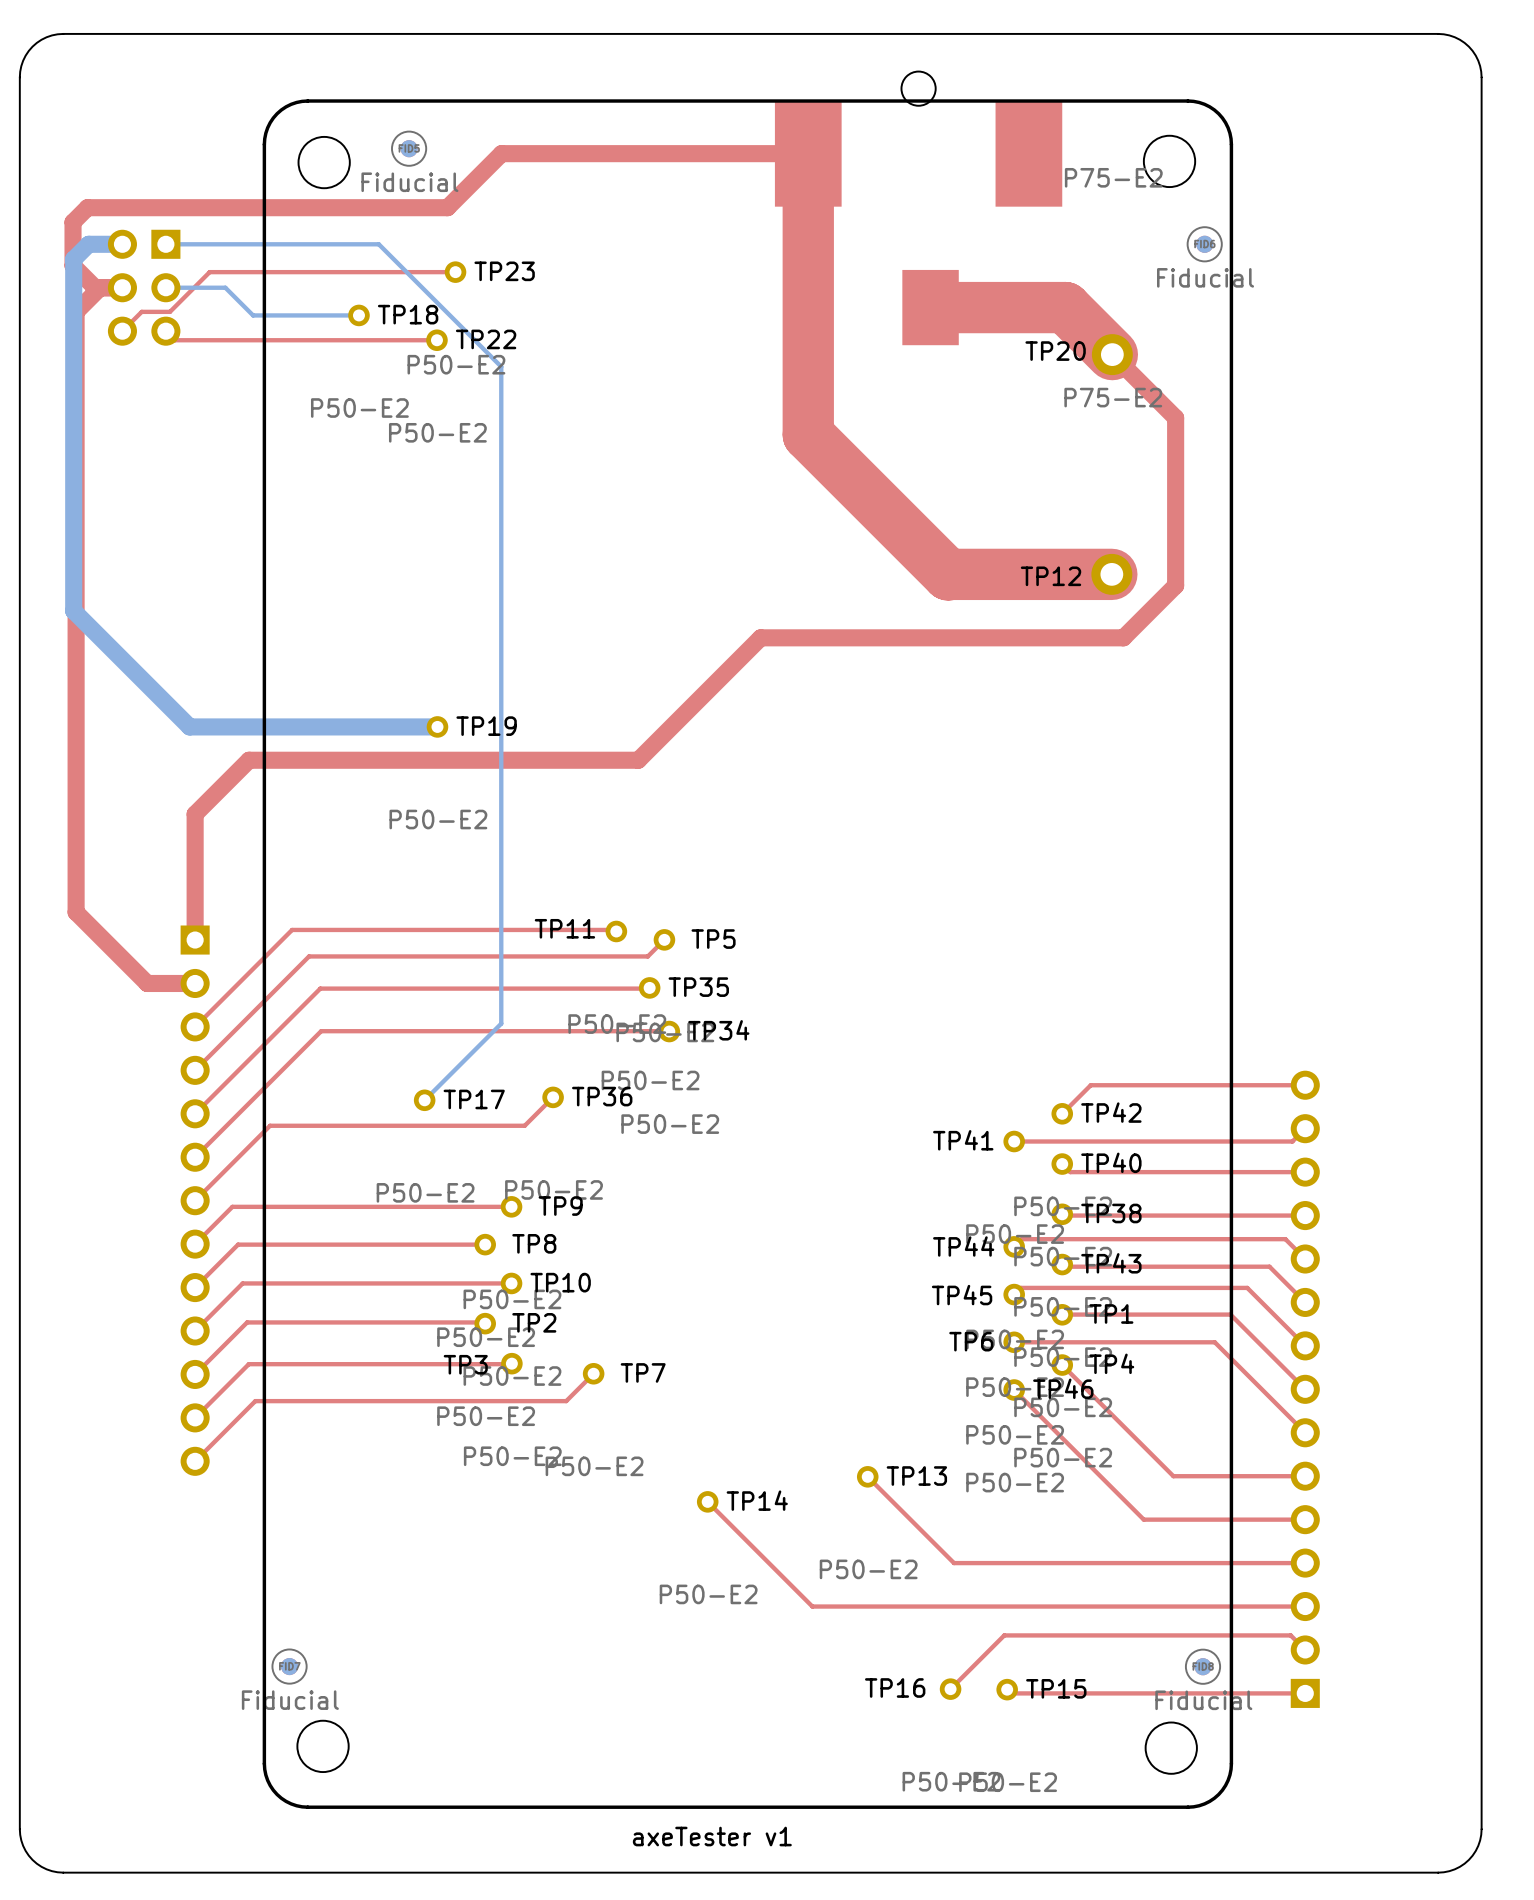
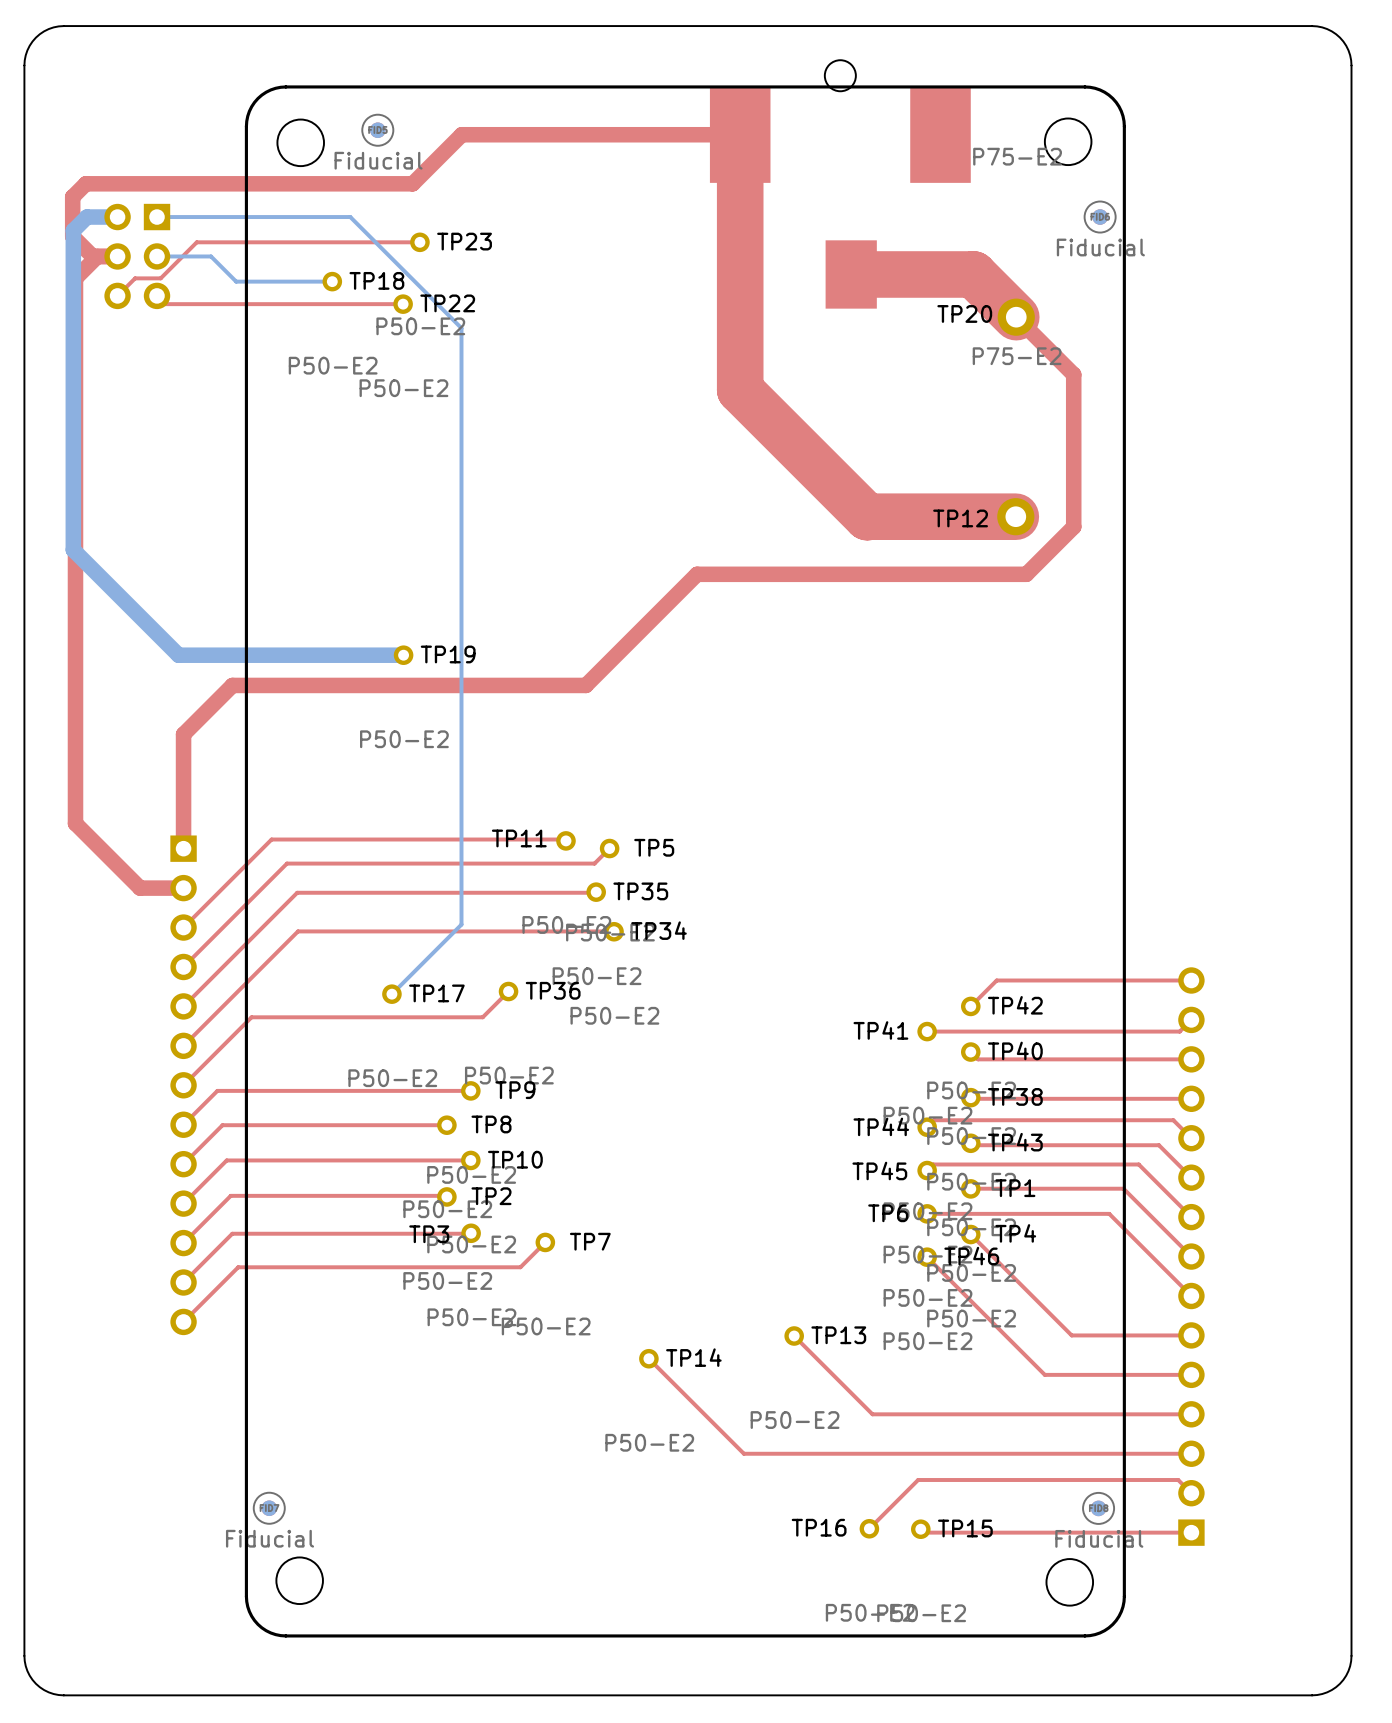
text: axeTester v1 (712, 1836) -> none

